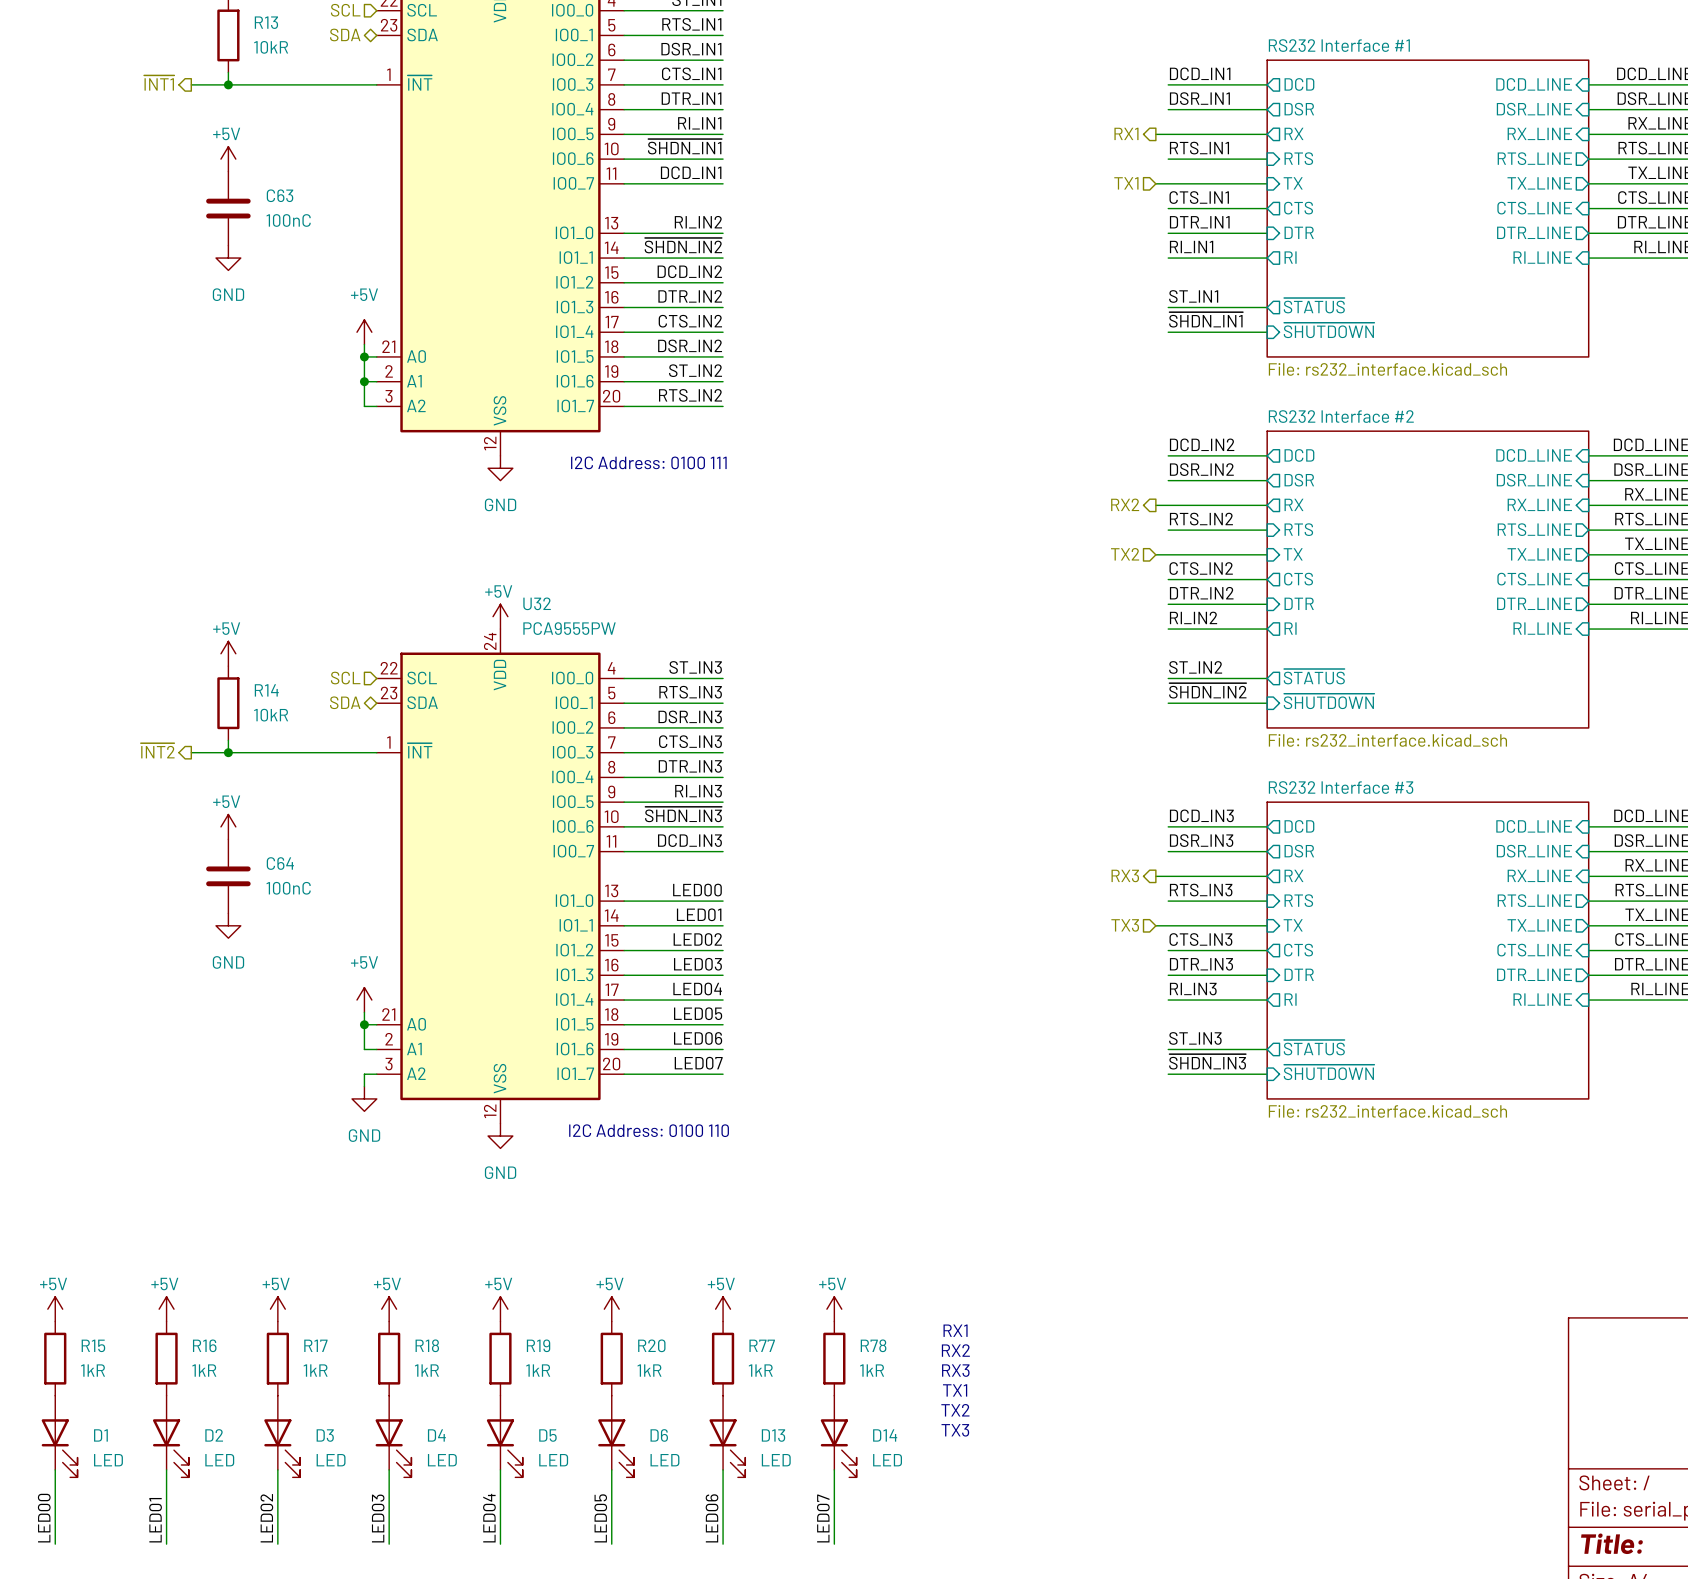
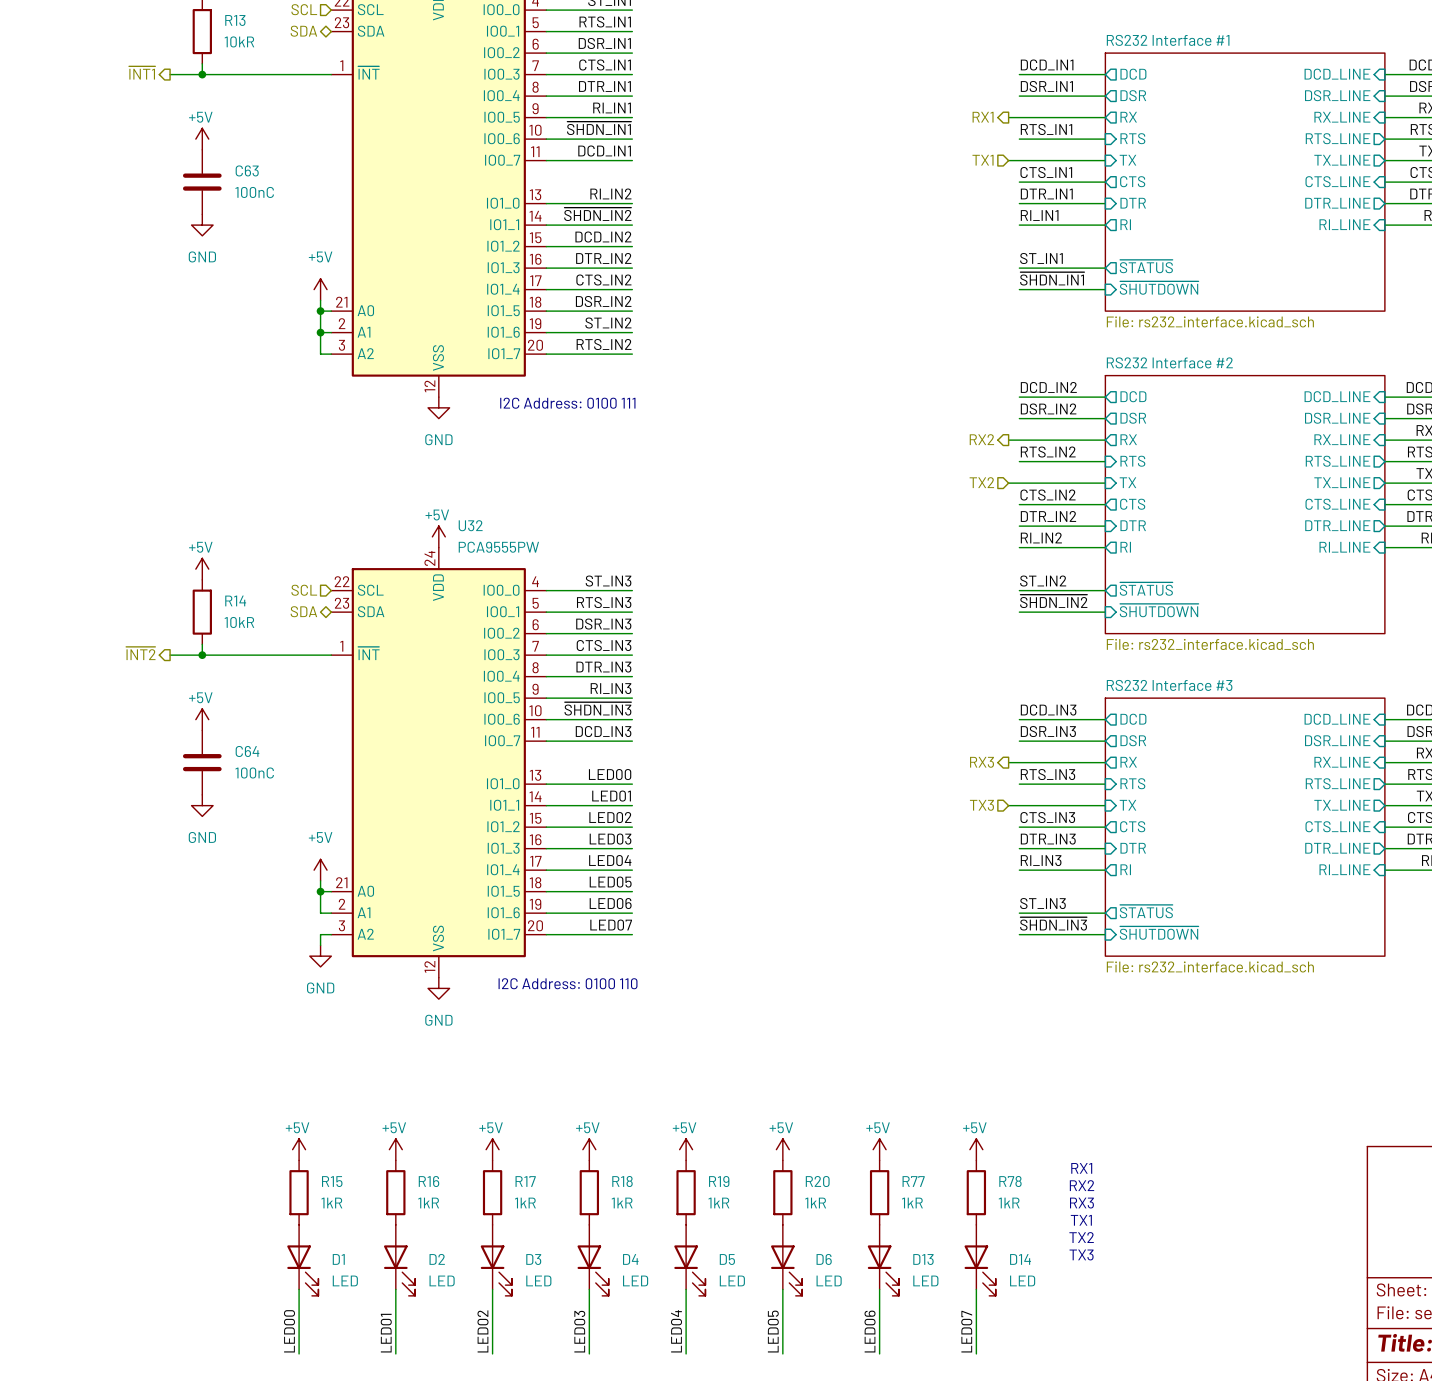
power symbol: +5V (55, 1309) -> none
power symbol: +5V (166, 1309) -> none
power symbol: +5V (277, 1309) -> none
power symbol: +5V (389, 1309) -> none
power symbol: +5V (500, 1309) -> none
power symbol: +5V (611, 1309) -> none
power symbol: +5V (723, 1309) -> none
power symbol: +5V (834, 1309) -> none
power symbol: none -> +5V (299, 1149)
power symbol: none -> +5V (395, 1149)
power symbol: none -> +5V (492, 1149)
power symbol: none -> +5V (589, 1149)
power symbol: none -> +5V (686, 1149)
power symbol: none -> +5V (782, 1149)
power symbol: none -> +5V (879, 1149)
power symbol: none -> +5V (976, 1149)
text: RX1 (955, 1330) -> none
text: none -> RX1 (1081, 1168)
text: RX2 (955, 1350) -> none
R15 position: (55, 1358) -> (299, 1192)
R16 position: (166, 1358) -> (395, 1192)
R17 position: (277, 1358) -> (492, 1192)
R18 position: (389, 1358) -> (589, 1192)
R19 position: (500, 1358) -> (686, 1192)
R20 position: (611, 1358) -> (782, 1192)
R77 position: (723, 1358) -> (879, 1192)
R78 position: (834, 1358) -> (976, 1192)
text: none -> RX2 (1082, 1185)
text: RX3 (955, 1370) -> none
text: none -> RX3 (1081, 1203)
text: TX1 (955, 1390) -> none
text: none -> TX1 (1081, 1220)
text: TX2 (955, 1410) -> none
text: none -> TX2 (1081, 1237)
text: TX3 (955, 1430) -> none
D1 position: (59, 1436) -> (302, 1260)
D2 position: (170, 1436) -> (399, 1260)
D3 position: (282, 1436) -> (496, 1260)
D4 position: (393, 1436) -> (593, 1260)
D5 position: (504, 1436) -> (689, 1260)
D6 position: (616, 1436) -> (786, 1260)
D13 position: (727, 1436) -> (883, 1260)
D14 position: (838, 1436) -> (980, 1260)
text: none -> TX3 (1081, 1254)
wire: (55, 1469) (55, 1544) -> none
wire: (166, 1469) (166, 1544) -> (299, 1289) (299, 1353)
wire: (277, 1469) (277, 1544) -> (395, 1289) (395, 1353)
wire: (389, 1469) (389, 1544) -> (492, 1289) (492, 1353)
wire: (500, 1469) (500, 1544) -> (589, 1289) (589, 1353)
wire: (611, 1469) (611, 1544) -> (686, 1289) (686, 1353)
wire: (723, 1469) (723, 1544) -> (782, 1289) (782, 1353)
wire: (834, 1469) (834, 1544) -> (879, 1289) (879, 1353)
wire: none -> (976, 1289) (976, 1353)
label: LED00 (44, 1518) -> none
label: LED02 (266, 1518) -> none
label: LED03 (378, 1518) -> none
label: LED04 (489, 1518) -> none
label: LED05 (600, 1518) -> none
label: LED06 (712, 1518) -> none
label: LED07 (823, 1518) -> none
label: LED01 (155, 1520) -> none
label: none -> LED00 (289, 1331)
label: none -> LED02 (482, 1331)
label: none -> LED03 (579, 1331)
label: none -> LED04 (676, 1331)
label: none -> LED05 (773, 1331)
label: none -> LED06 (870, 1331)
label: none -> LED07 (966, 1331)
label: none -> LED01 (386, 1333)

